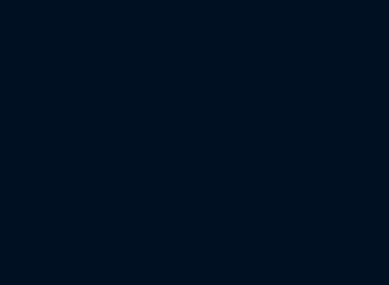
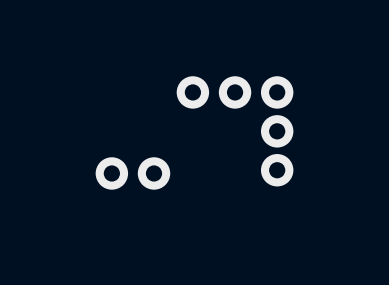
via: none -> (192, 92)
via: none -> (235, 92)
via: none -> (277, 92)
via: none -> (277, 131)
via: none -> (277, 170)
via: none -> (111, 173)
via: none -> (154, 173)

